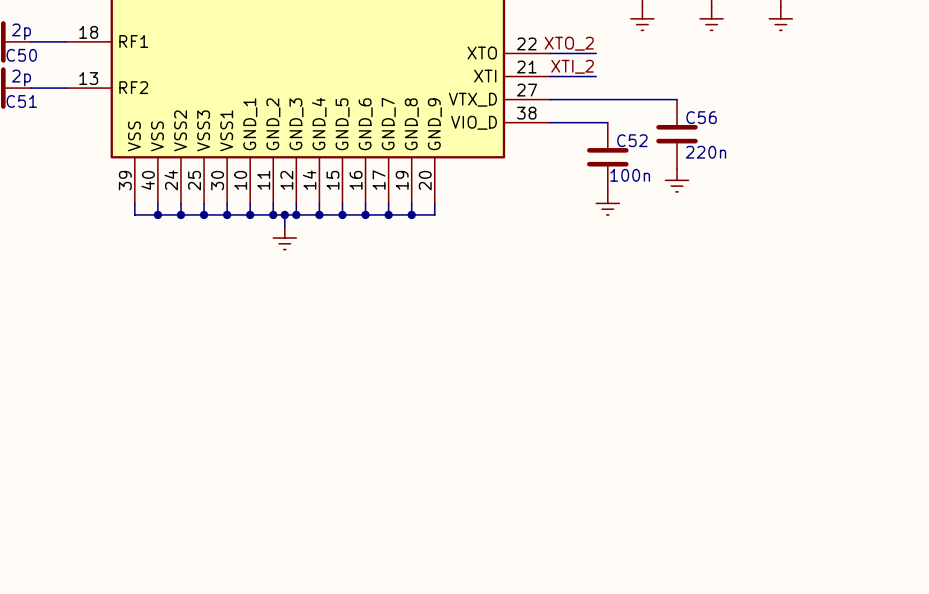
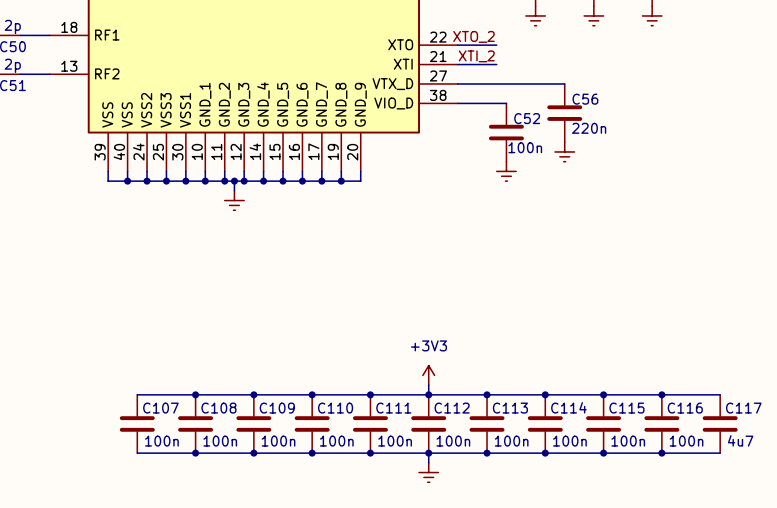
power symbol: none -> +3V3 (428, 375)
wire: none -> (428, 385) (428, 394)
wire: none -> (137, 394) (720, 394)
junction: none -> (195, 394)
junction: none -> (253, 394)
junction: none -> (312, 394)
junction: none -> (370, 394)
junction: none -> (428, 394)
junction: none -> (487, 394)
junction: none -> (545, 394)
junction: none -> (603, 394)
junction: none -> (661, 394)
C107: none -> 100n (137, 423)
C108: none -> 100n (195, 423)
C109: none -> 100n (253, 423)
C110: none -> 100n (312, 423)
C111: none -> 100n (370, 423)
C112: none -> 100n (428, 423)
C113: none -> 100n (487, 423)
C114: none -> 100n (545, 423)
C115: none -> 100n (603, 423)
C116: none -> 100n (661, 423)
C117: none -> 4u7 (720, 423)
wire: none -> (137, 453) (720, 453)
junction: none -> (195, 453)
junction: none -> (253, 453)
junction: none -> (312, 453)
junction: none -> (370, 453)
wire: none -> (428, 453) (428, 462)
junction: none -> (428, 453)
junction: none -> (487, 453)
junction: none -> (545, 453)
junction: none -> (603, 453)
junction: none -> (661, 453)
power symbol: none -> (428, 472)

